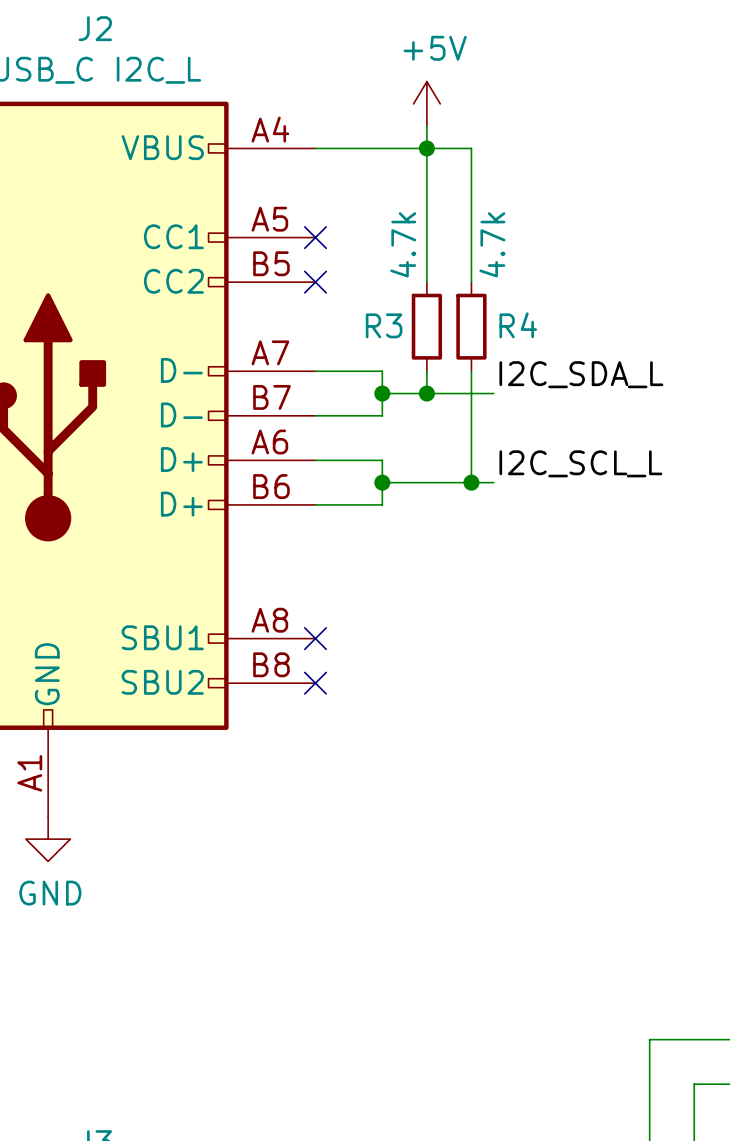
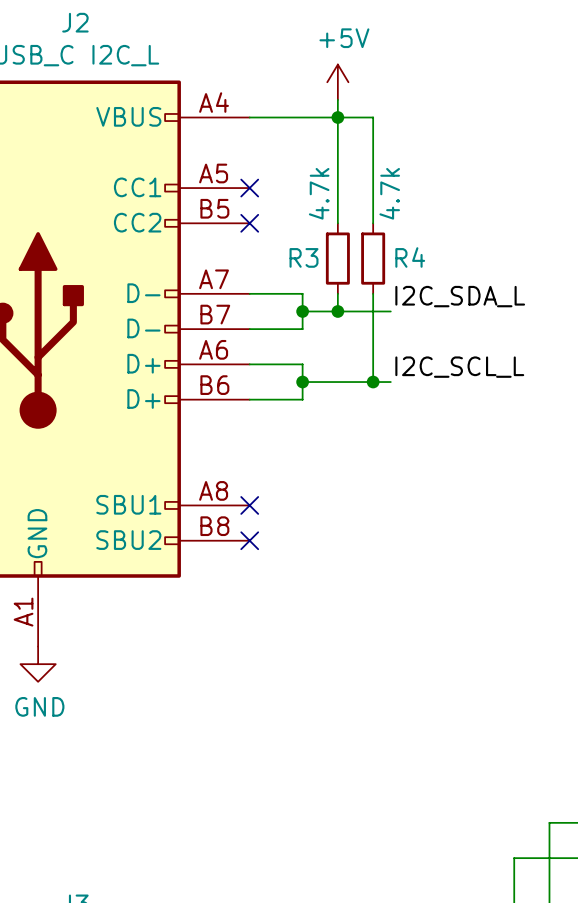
wire: (694, 1039) (649, 1039) (649, 1084) -> (549, 822) (549, 858) (514, 858)

